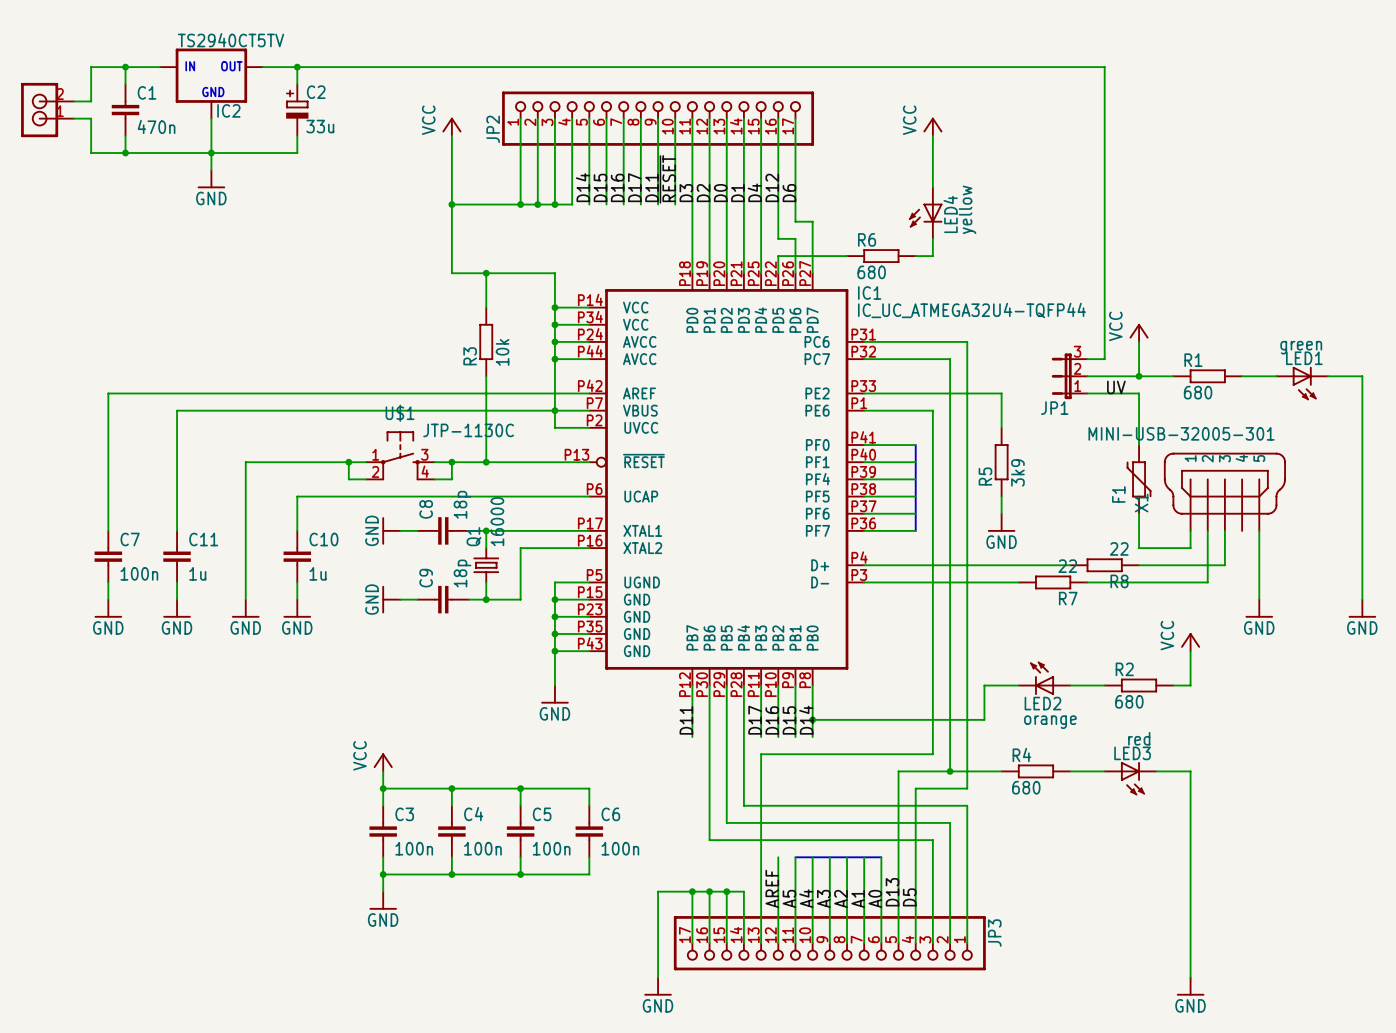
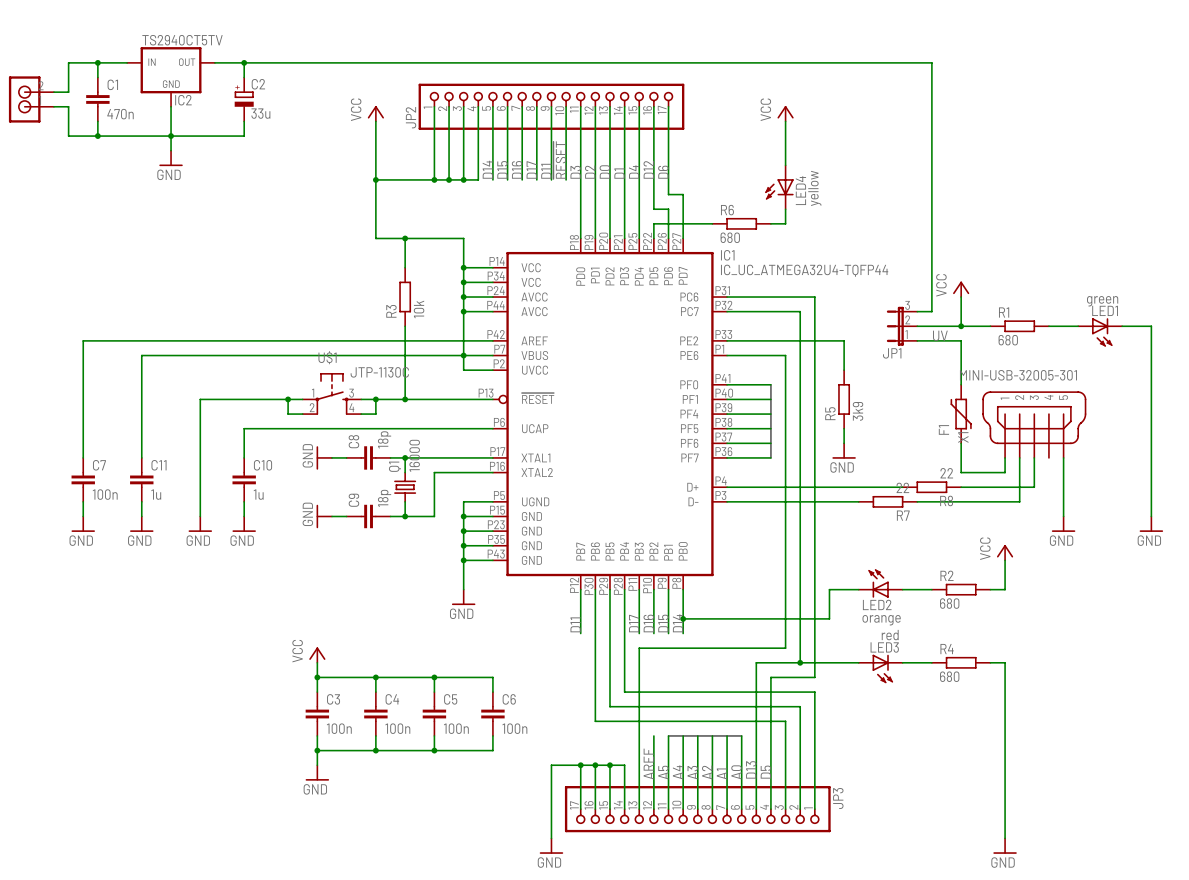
R4 position: (1035, 771) -> (961, 662)
LED3 position: (1130, 778) -> (880, 668)

